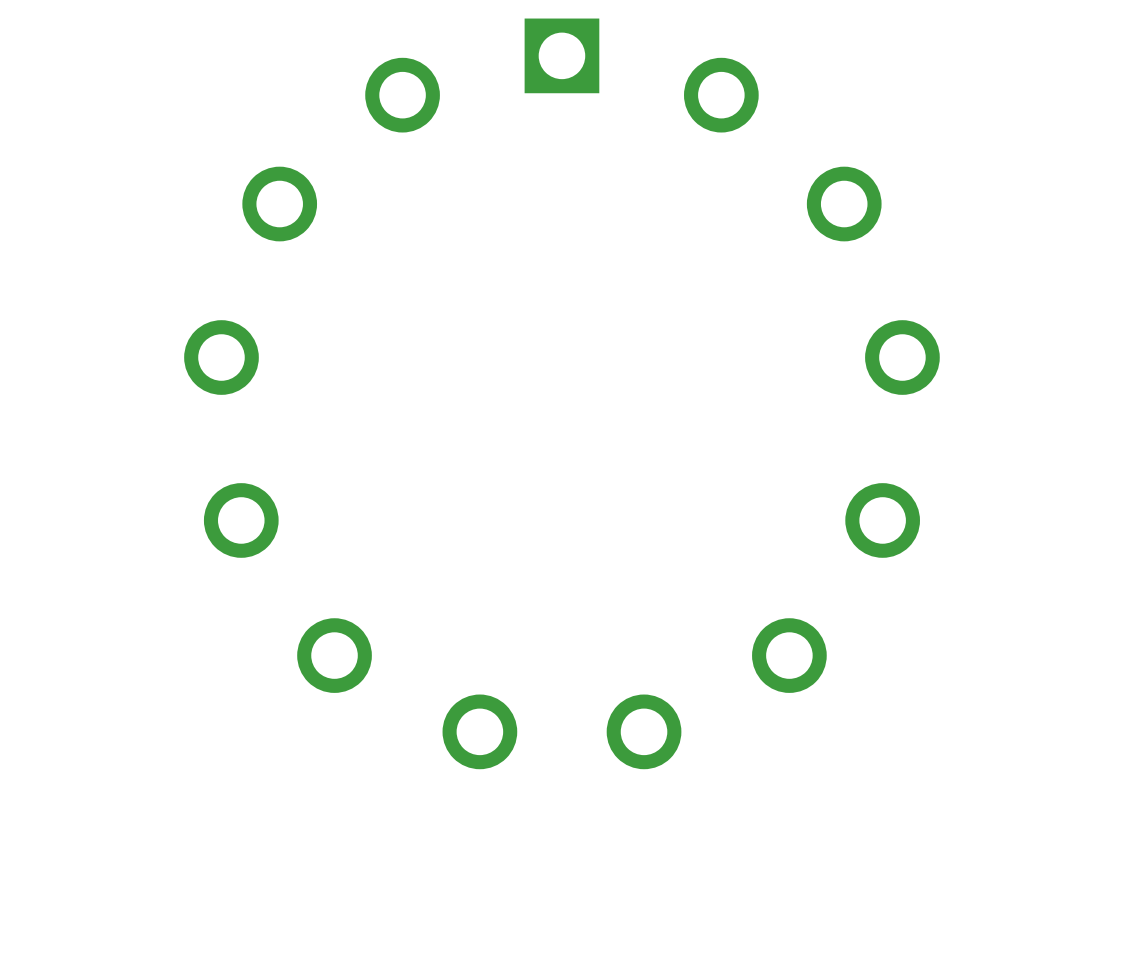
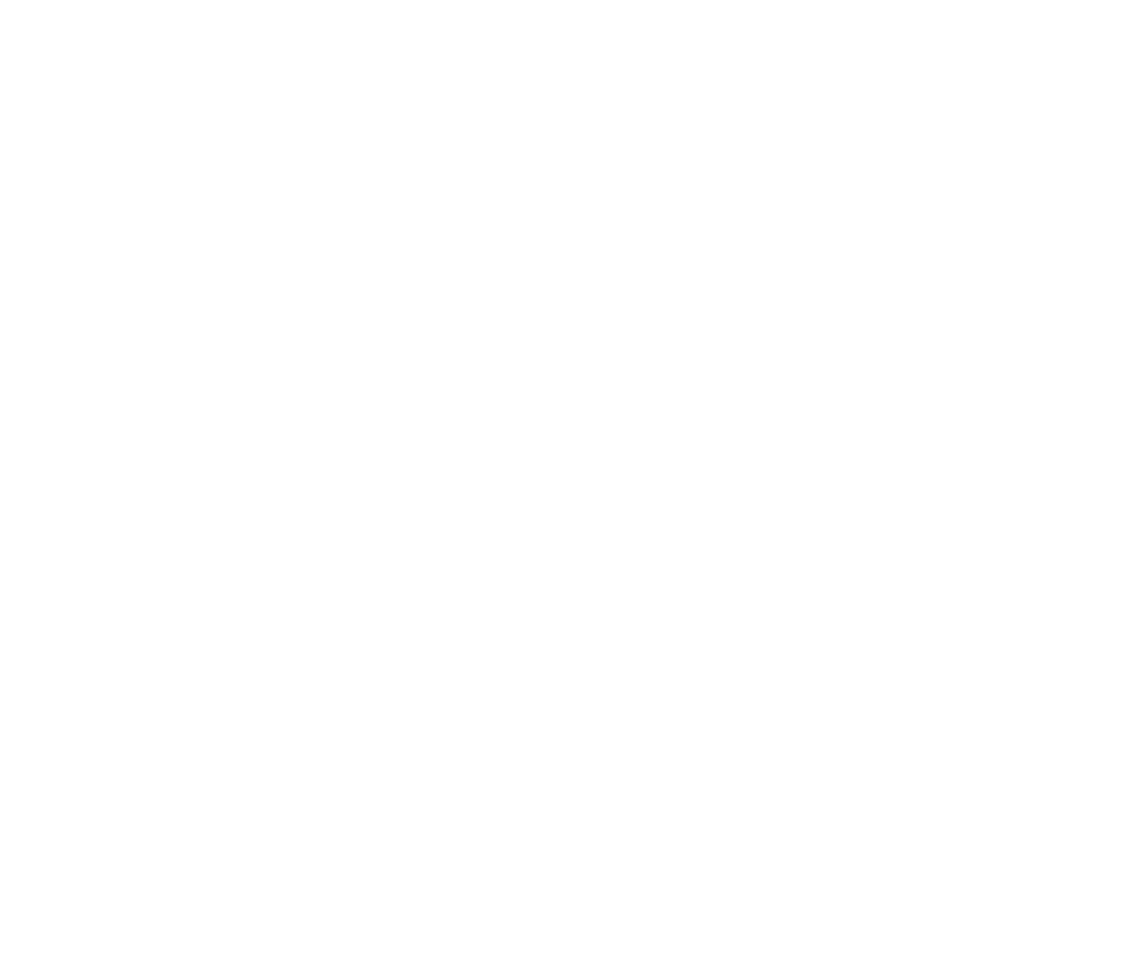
part: (561, 393) -> none

